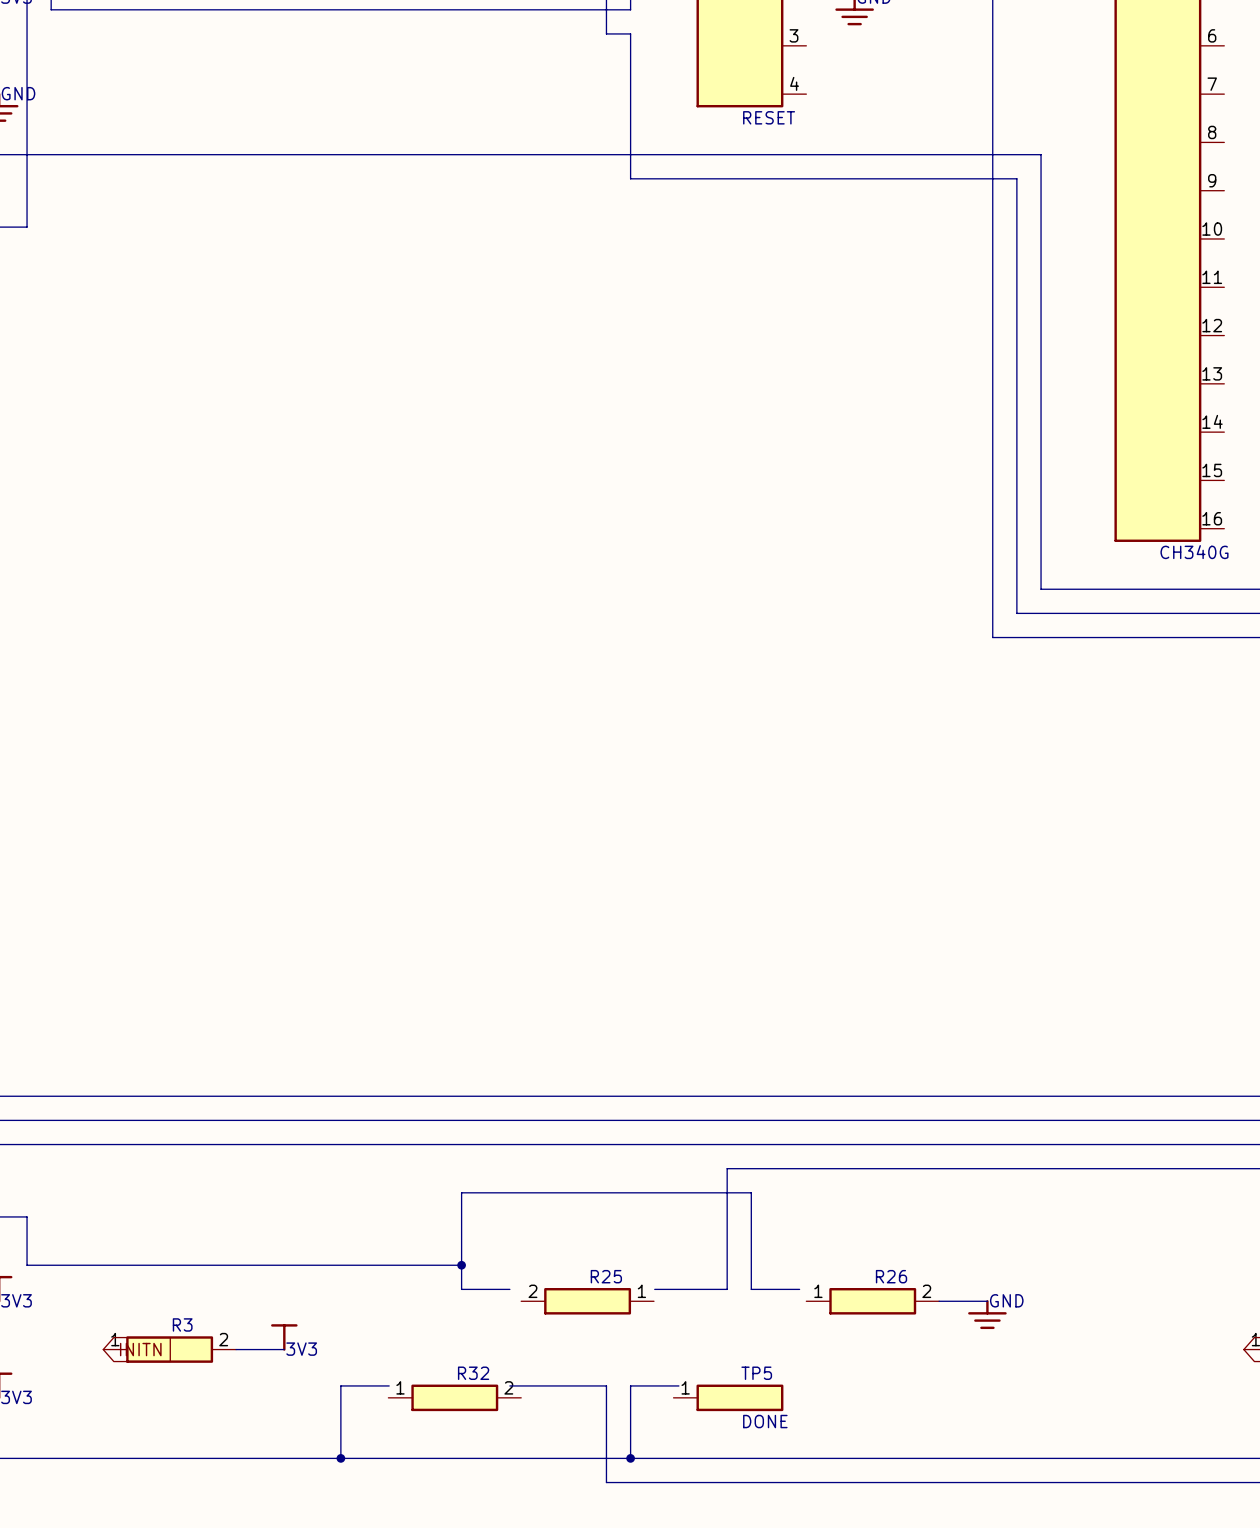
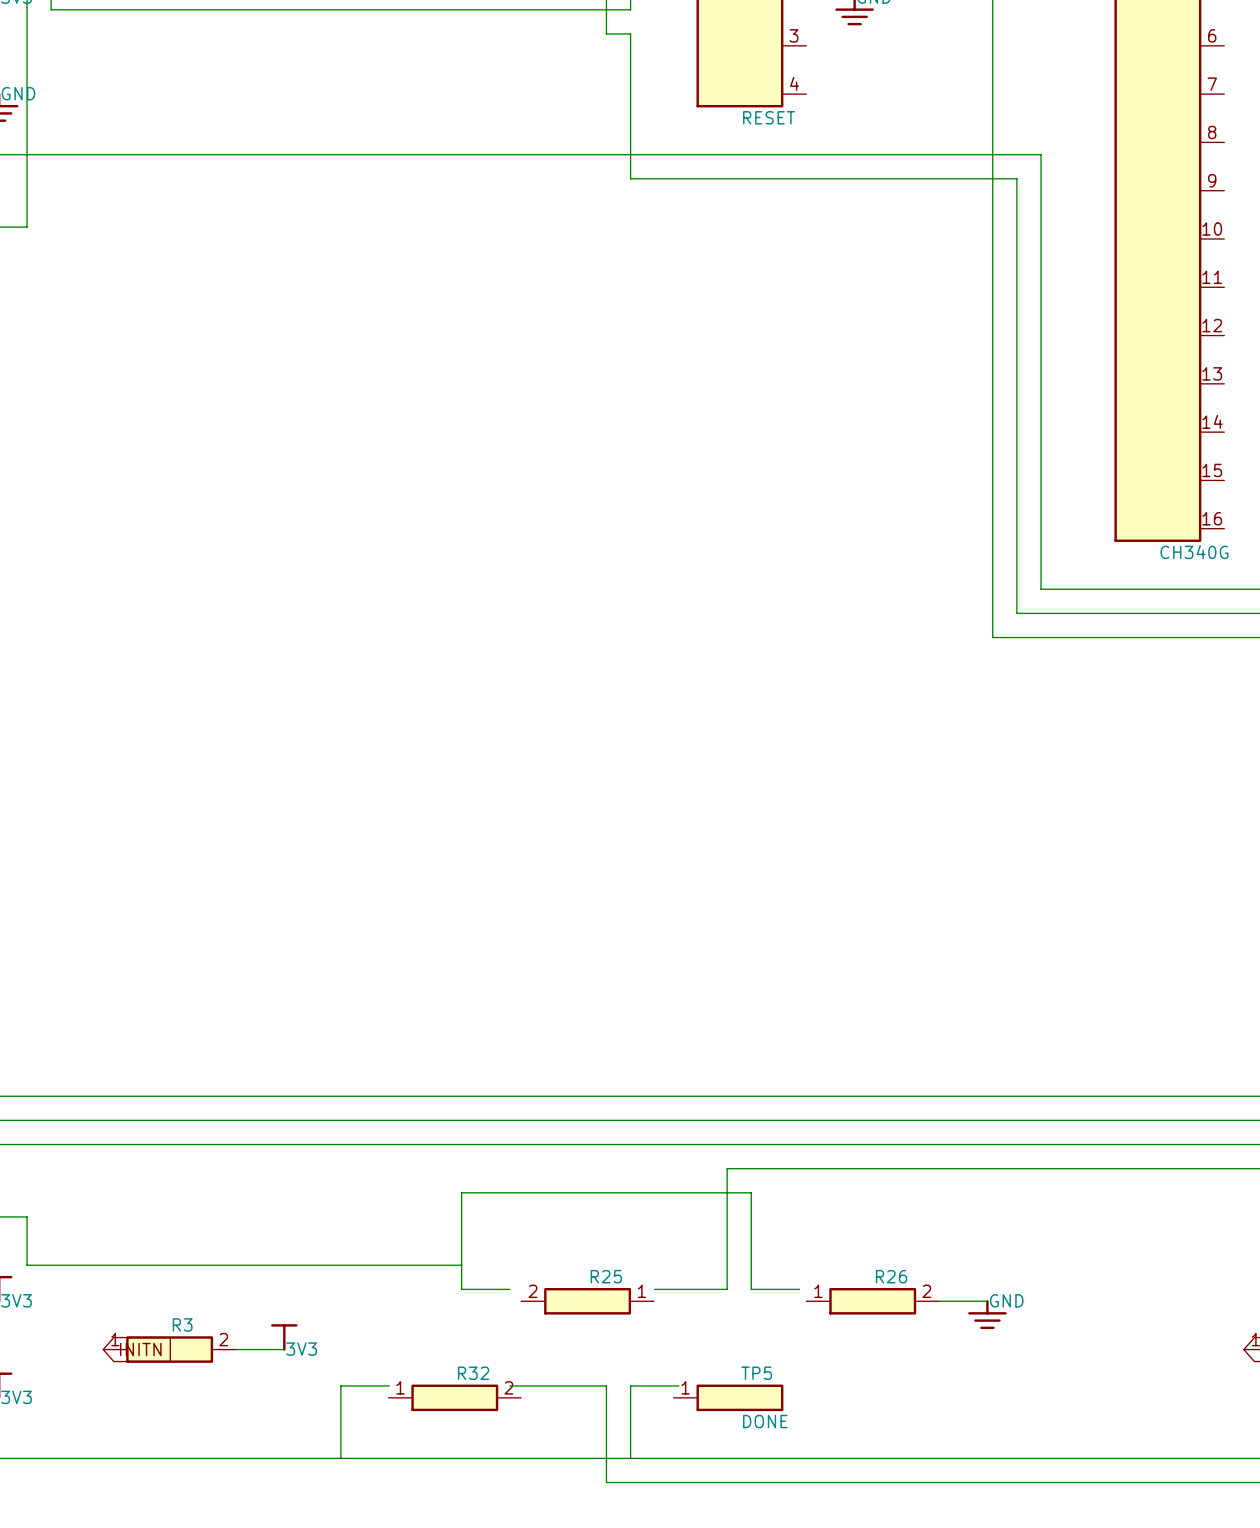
junction: (461, 1265) -> none
junction: (340, 1458) -> none
junction: (630, 1458) -> none

